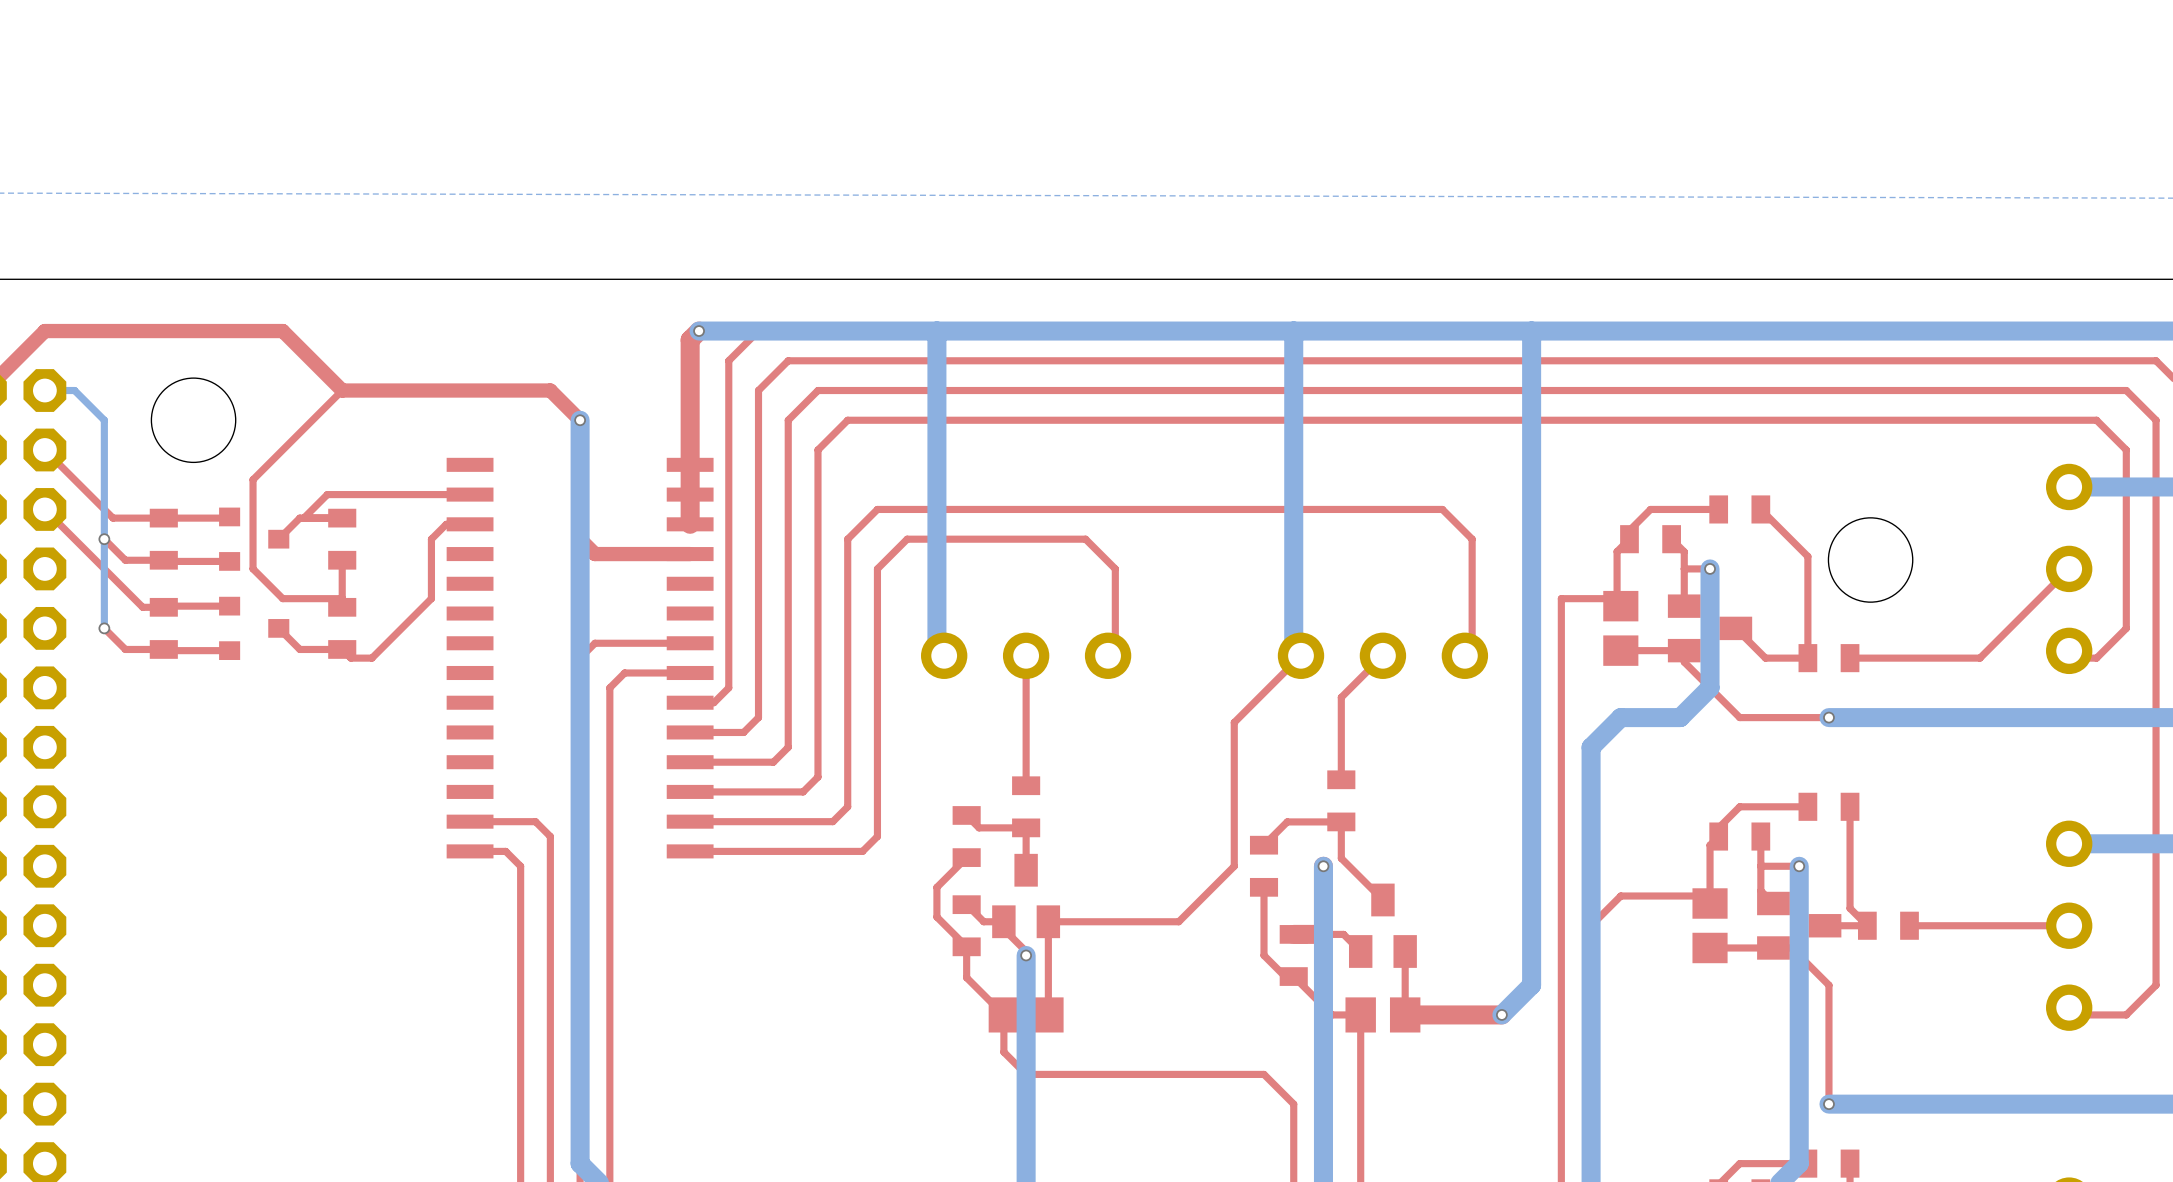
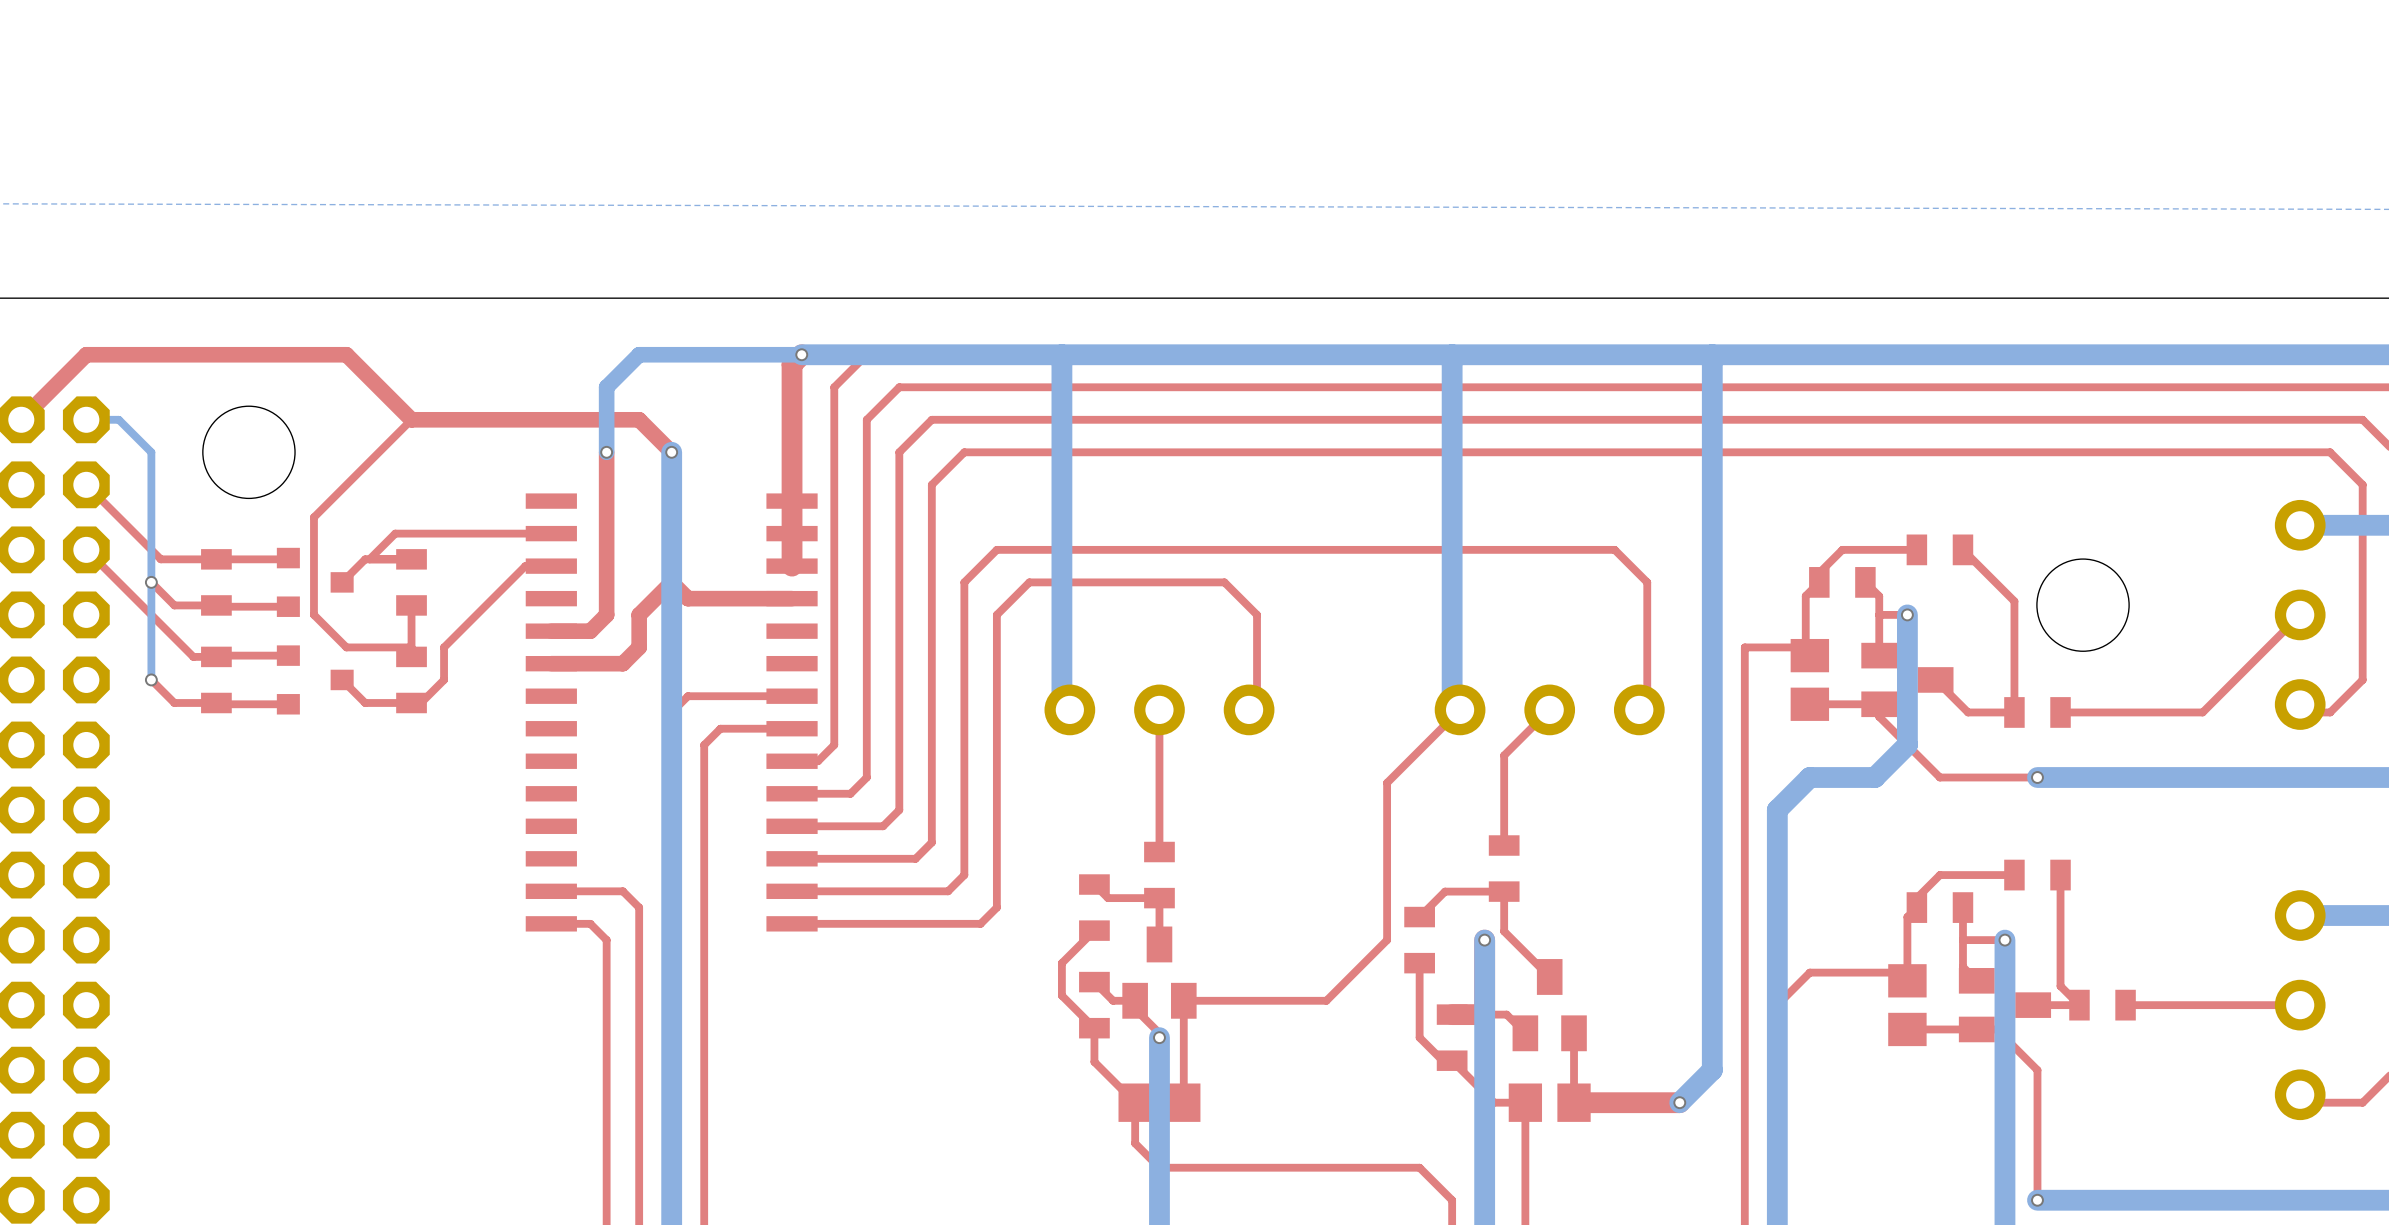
bottom track: none -> (801, 354) (639, 354) (606, 387) (606, 452)
top track: none -> (606, 452) (606, 614) (590, 631) (551, 631)
via: none -> (606, 452)
top track: (431, 539) (431, 598) (371, 658) (350, 658) (346, 653) -> (509, 582) (444, 647) (444, 679) (416, 707)
top track: none -> (671, 582) (639, 614) (639, 647) (622, 663) (551, 663)

